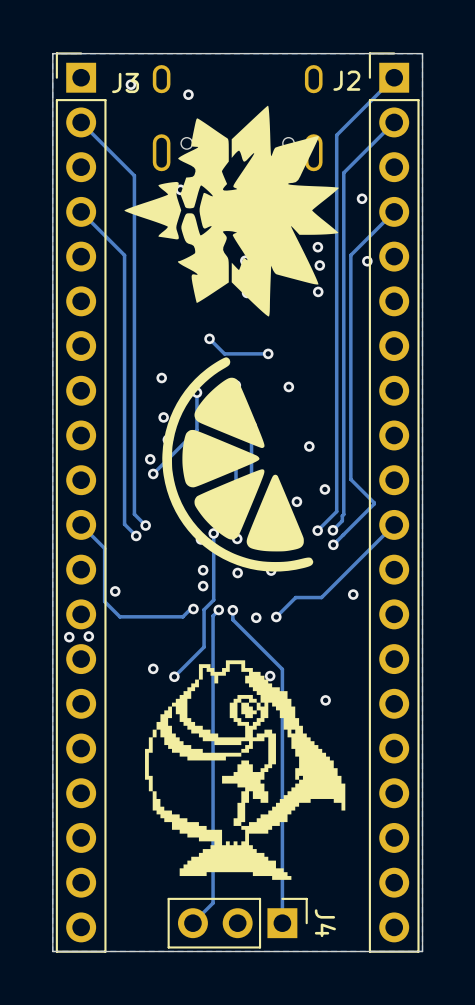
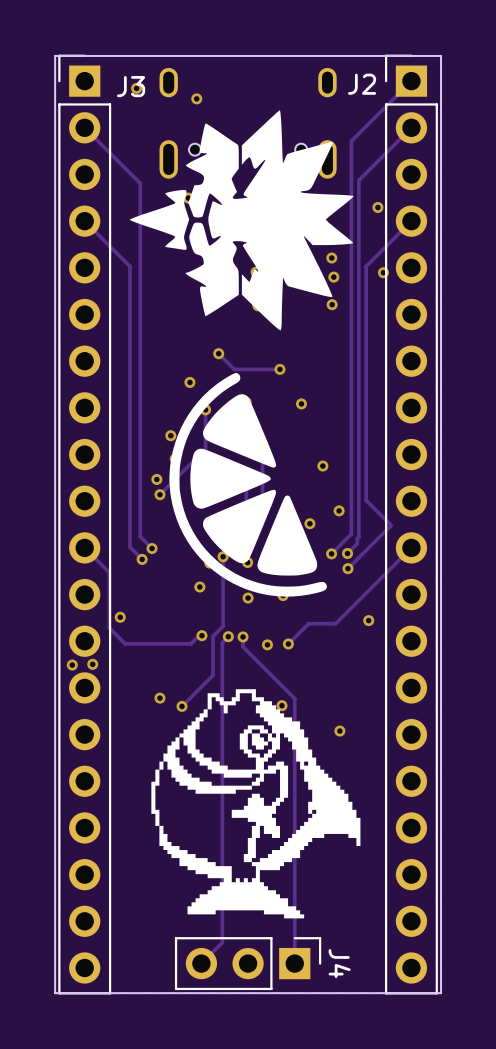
via position: (161, 378) -> (189, 382)
via: none -> (199, 587)
via: (203, 570) -> none
via: (203, 586) -> none

